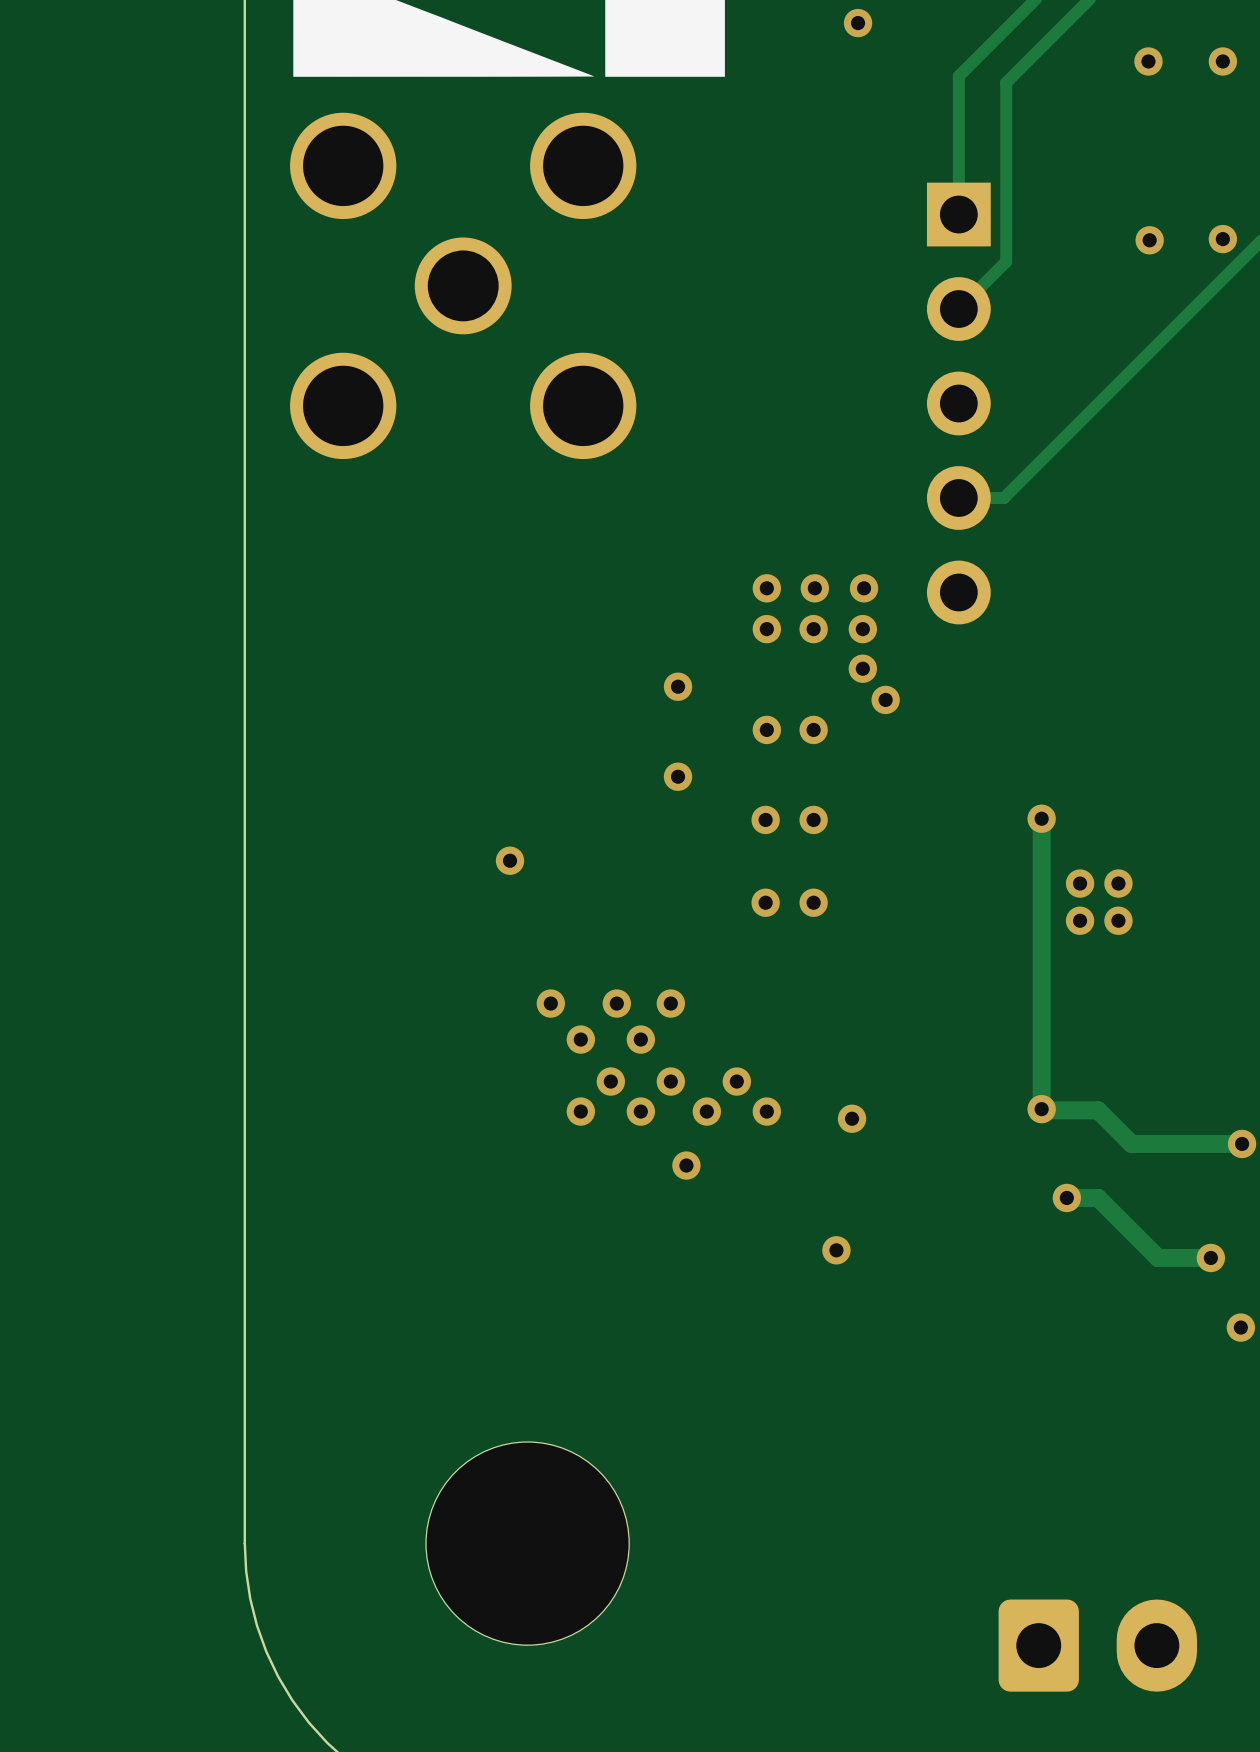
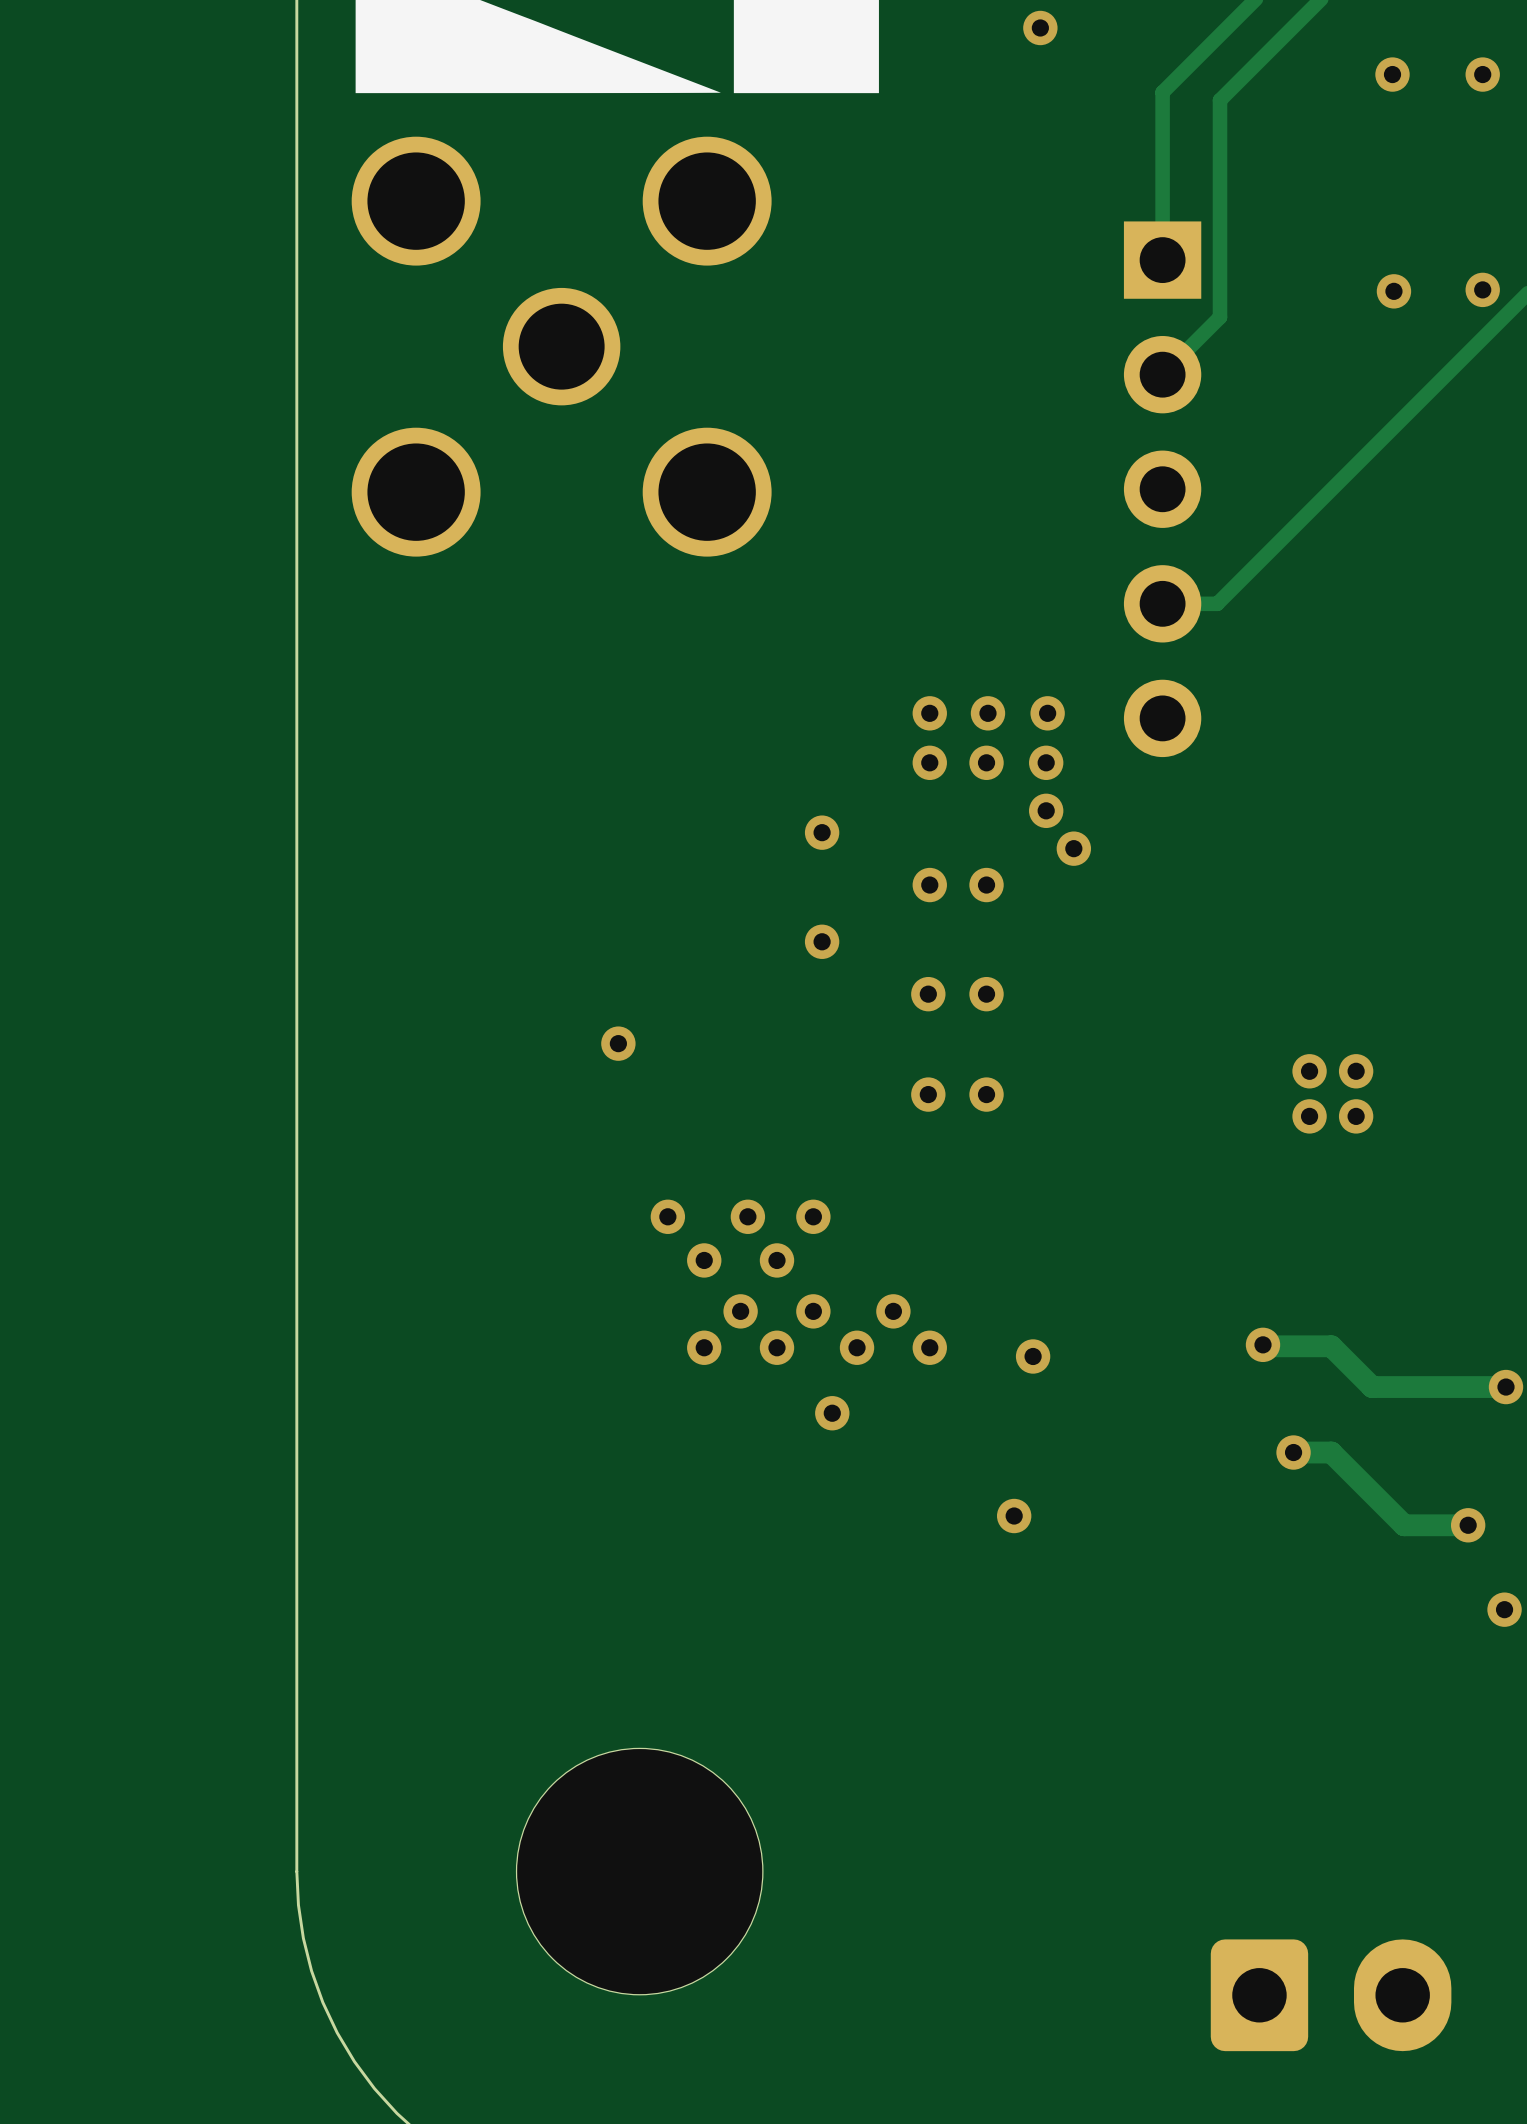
track: (1041, 818) (1041, 1109) -> none
via: (1041, 818) -> none

